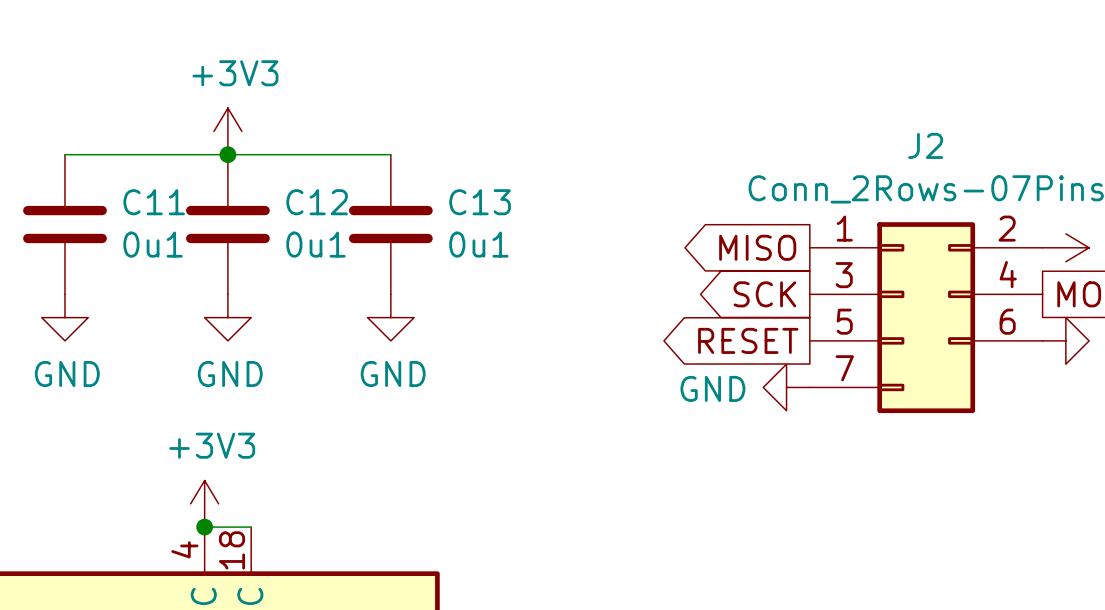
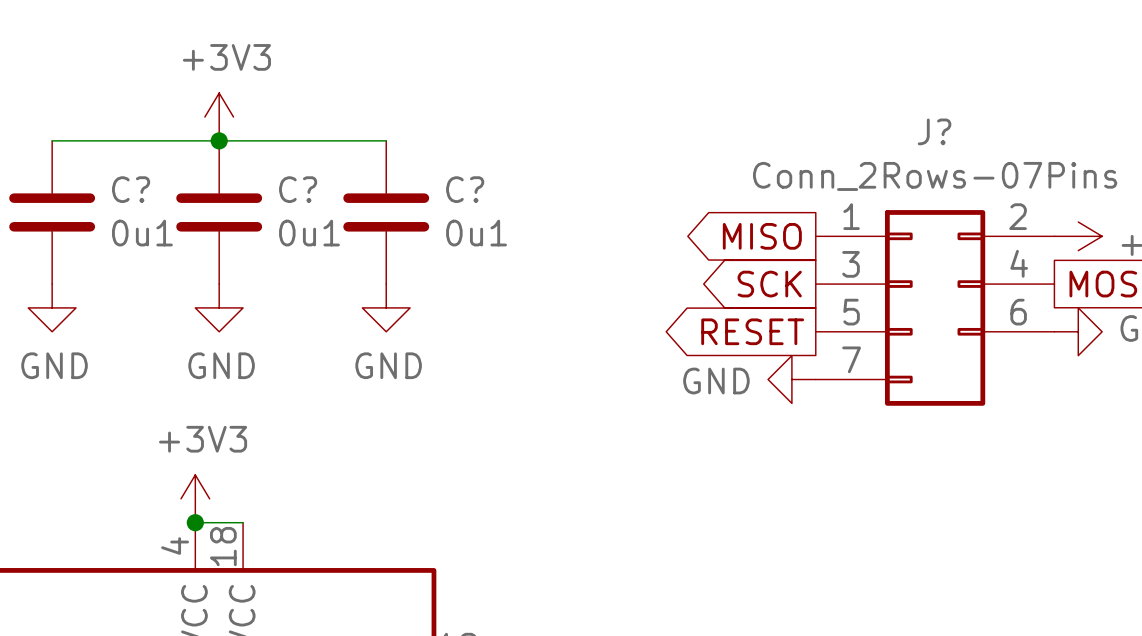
J2 name: J2 (925, 145) -> J? (934, 131)
C11 name: C11 (154, 202) -> C? (131, 189)
C12 name: C12 (317, 202) -> C? (298, 189)
C13 name: C13 (480, 202) -> C? (465, 189)

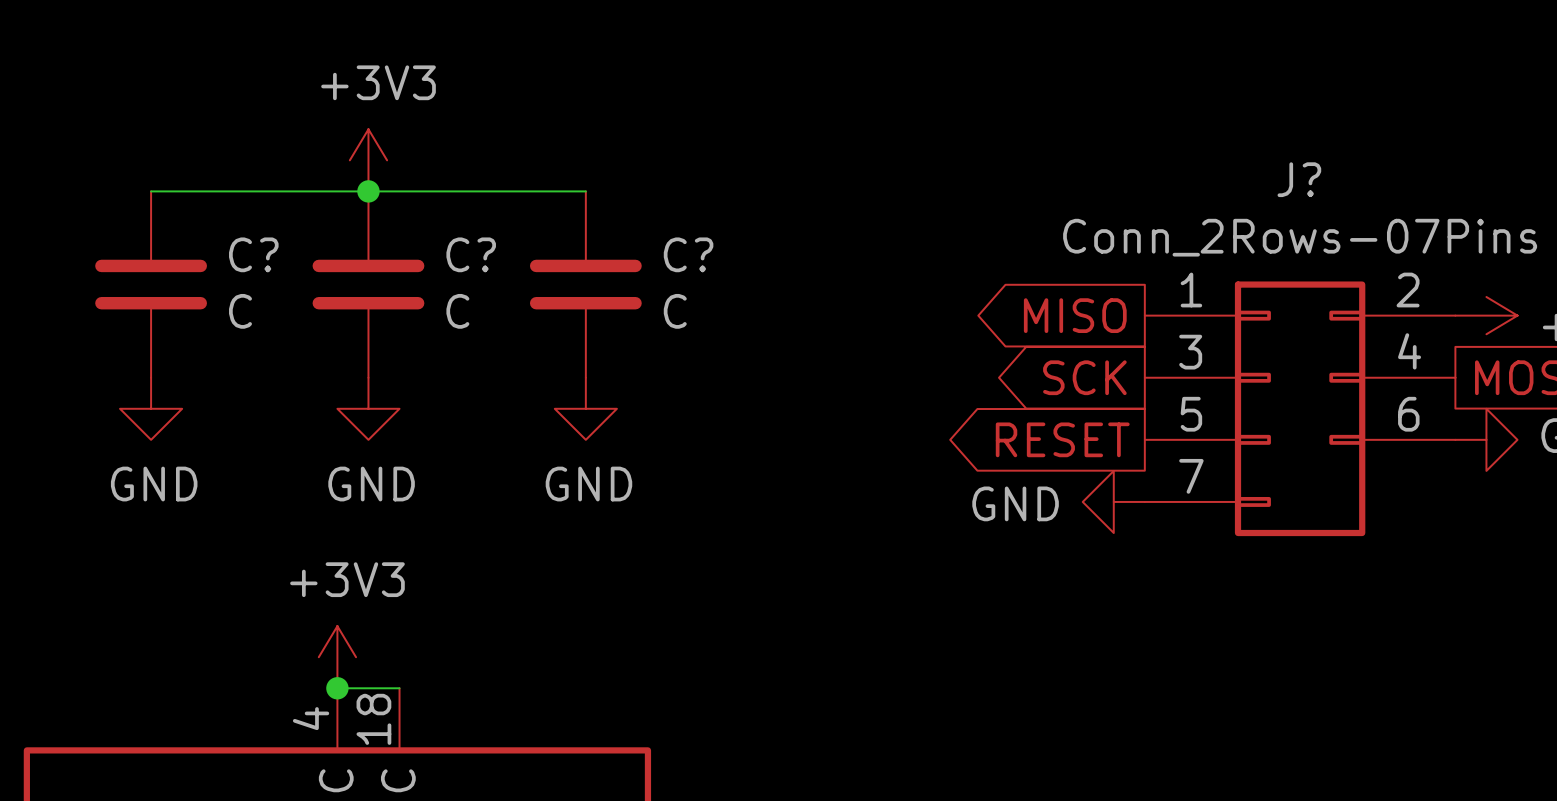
C? value: 0u1 (142, 233) -> C (240, 311)
C? value: 0u1 (309, 233) -> C (457, 311)
C? value: 0u1 (476, 233) -> C (675, 311)

